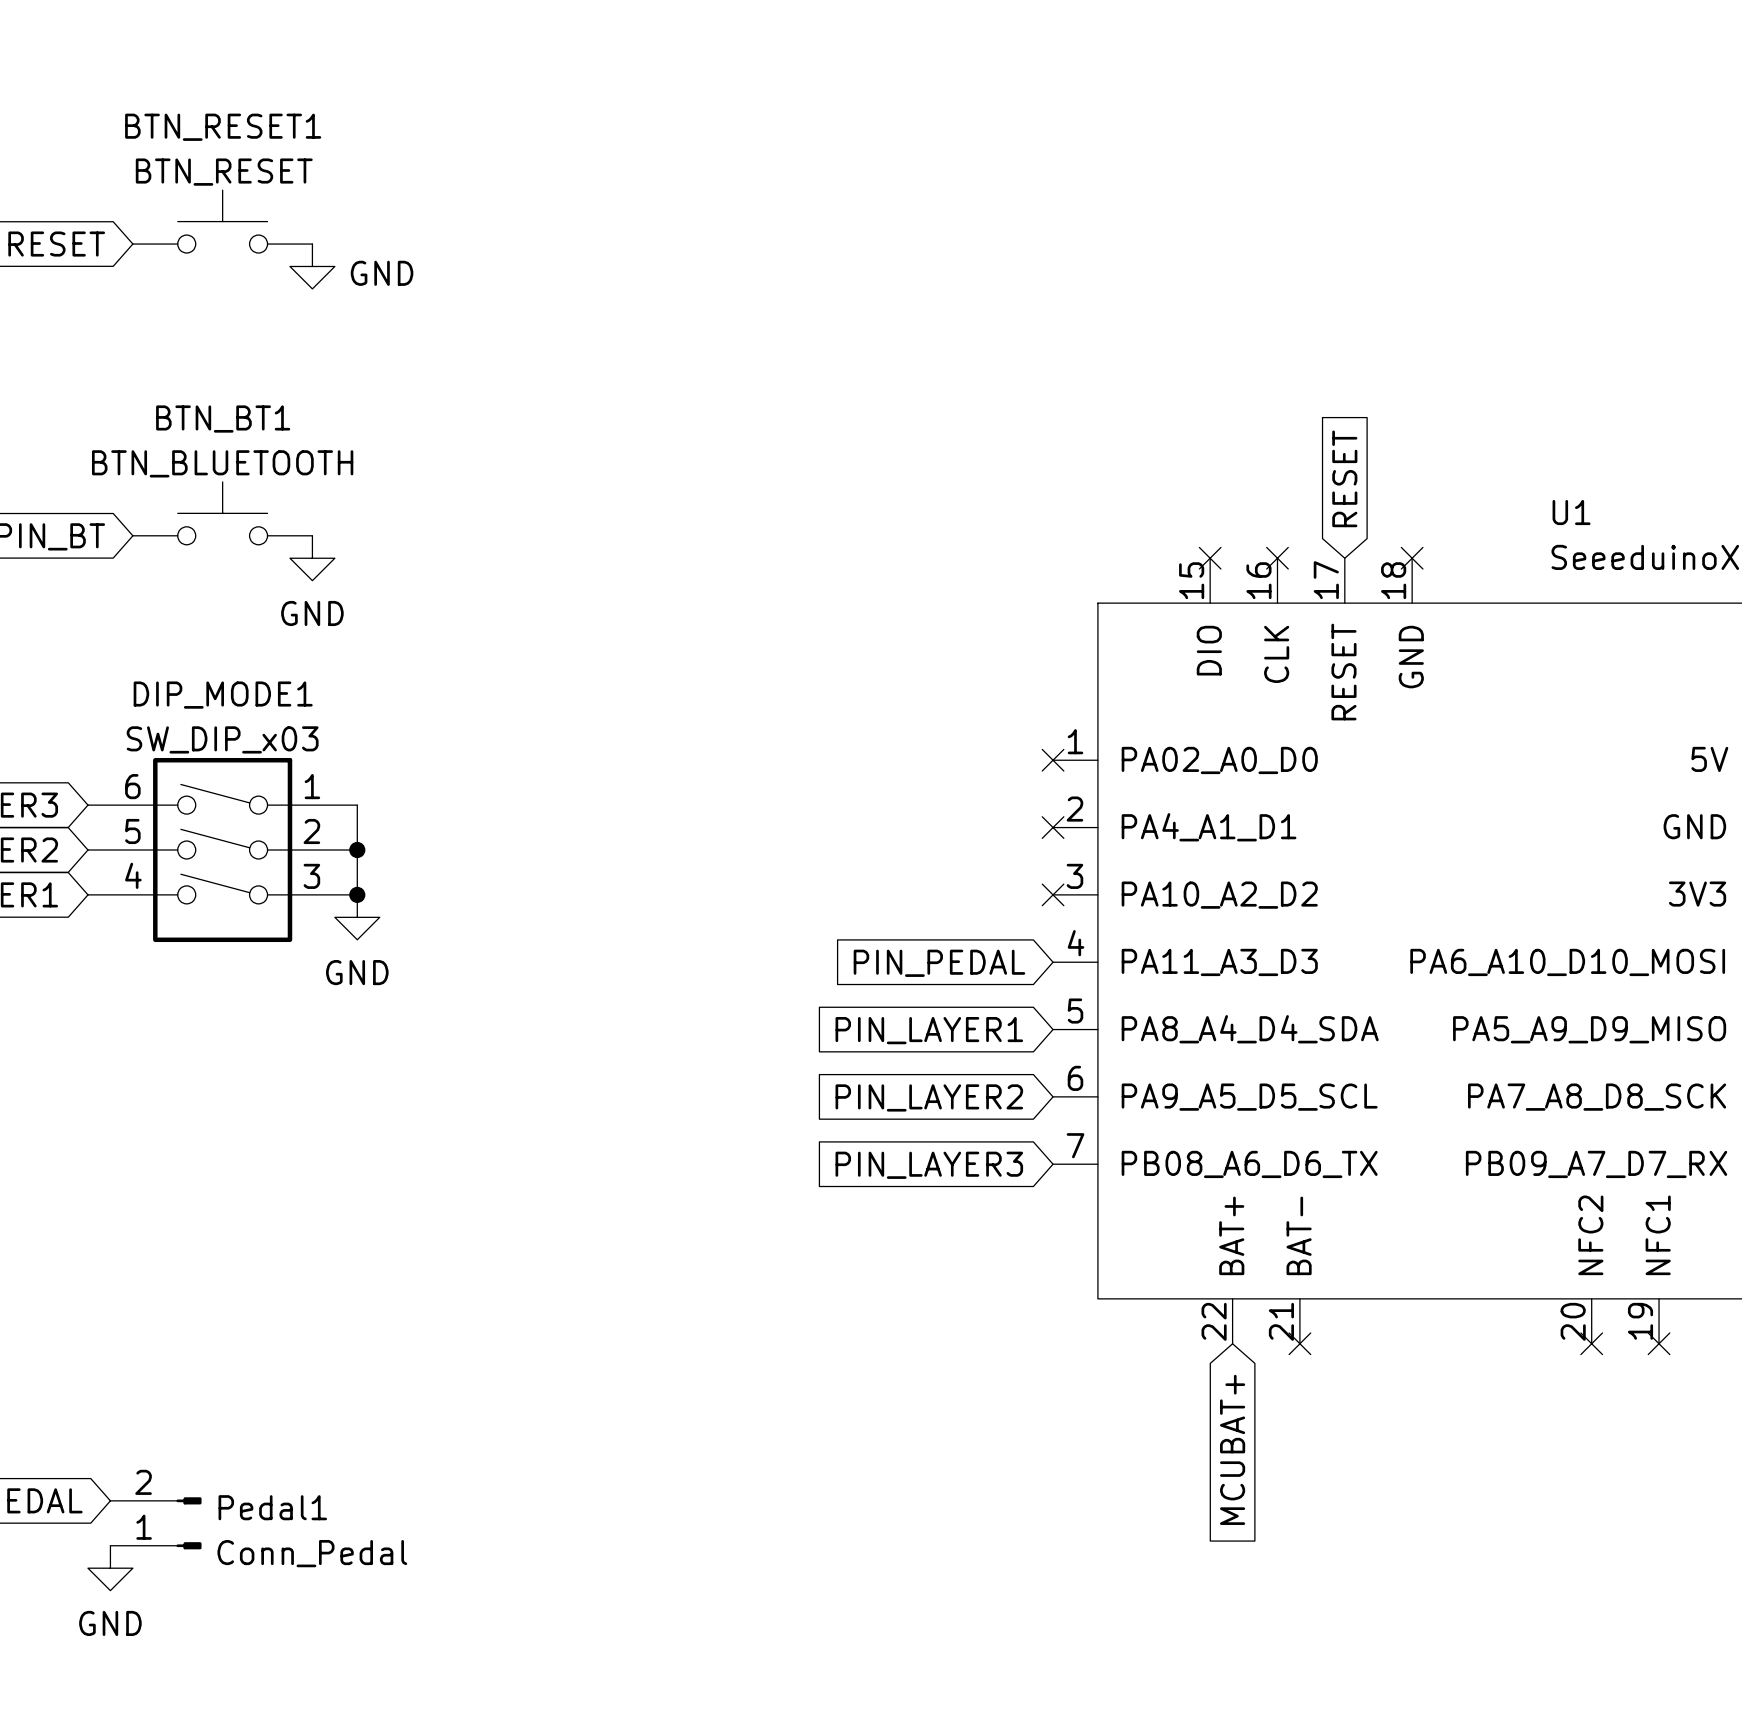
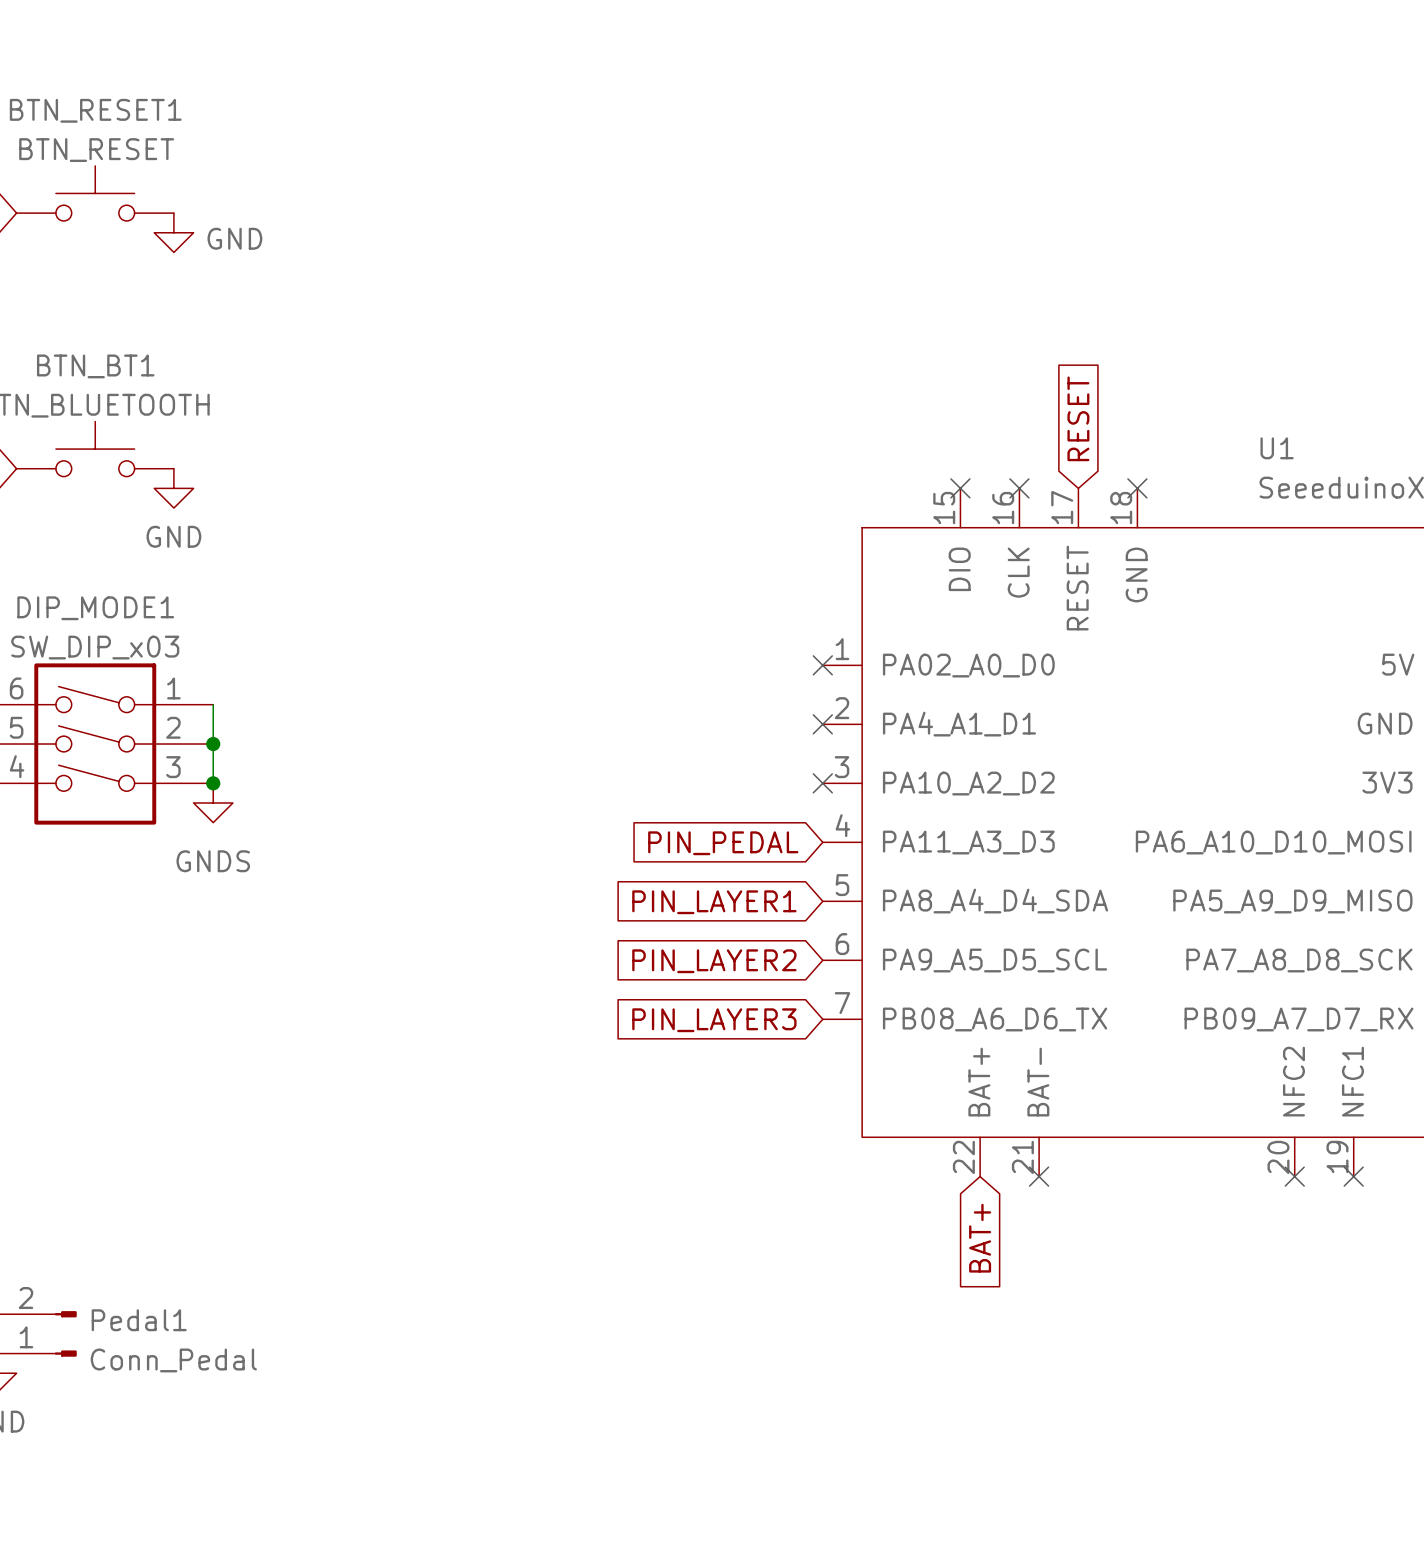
power symbol: GND (357, 917) -> GNDS (213, 803)
global label: MCUBAT+ (1232, 1449) -> BAT+ (980, 1238)

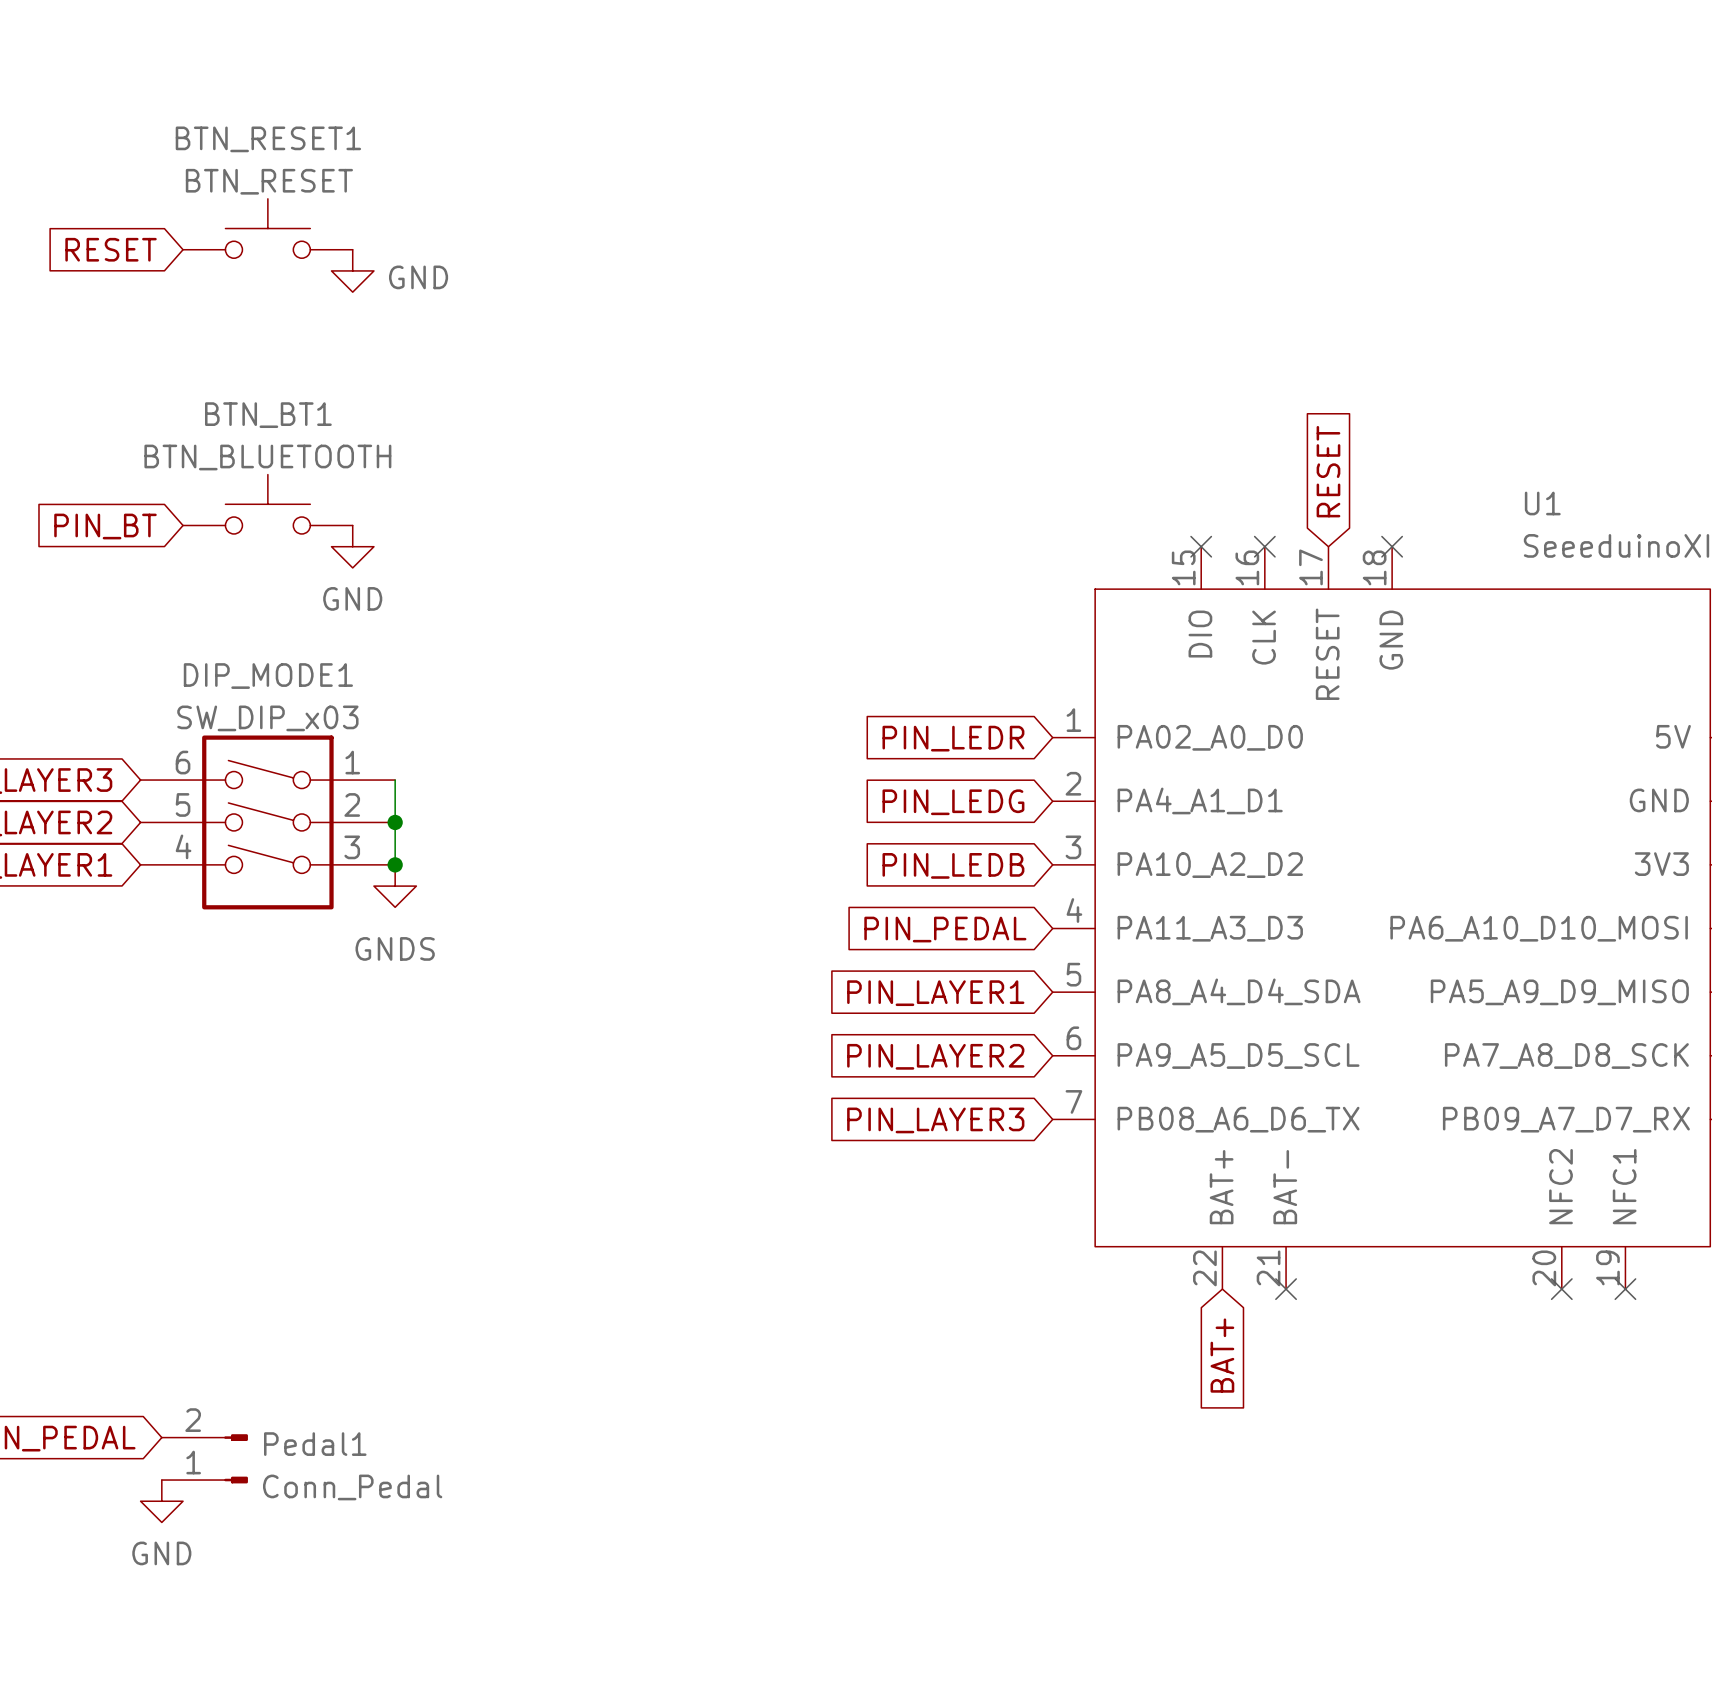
no-connect mark: (822, 665) -> none
global label: none -> PIN_LEDR (953, 738)
no-connect mark: (822, 724) -> none
global label: none -> PIN_LEDG (953, 802)
no-connect mark: (822, 783) -> none
global label: none -> PIN_LEDB (953, 865)

